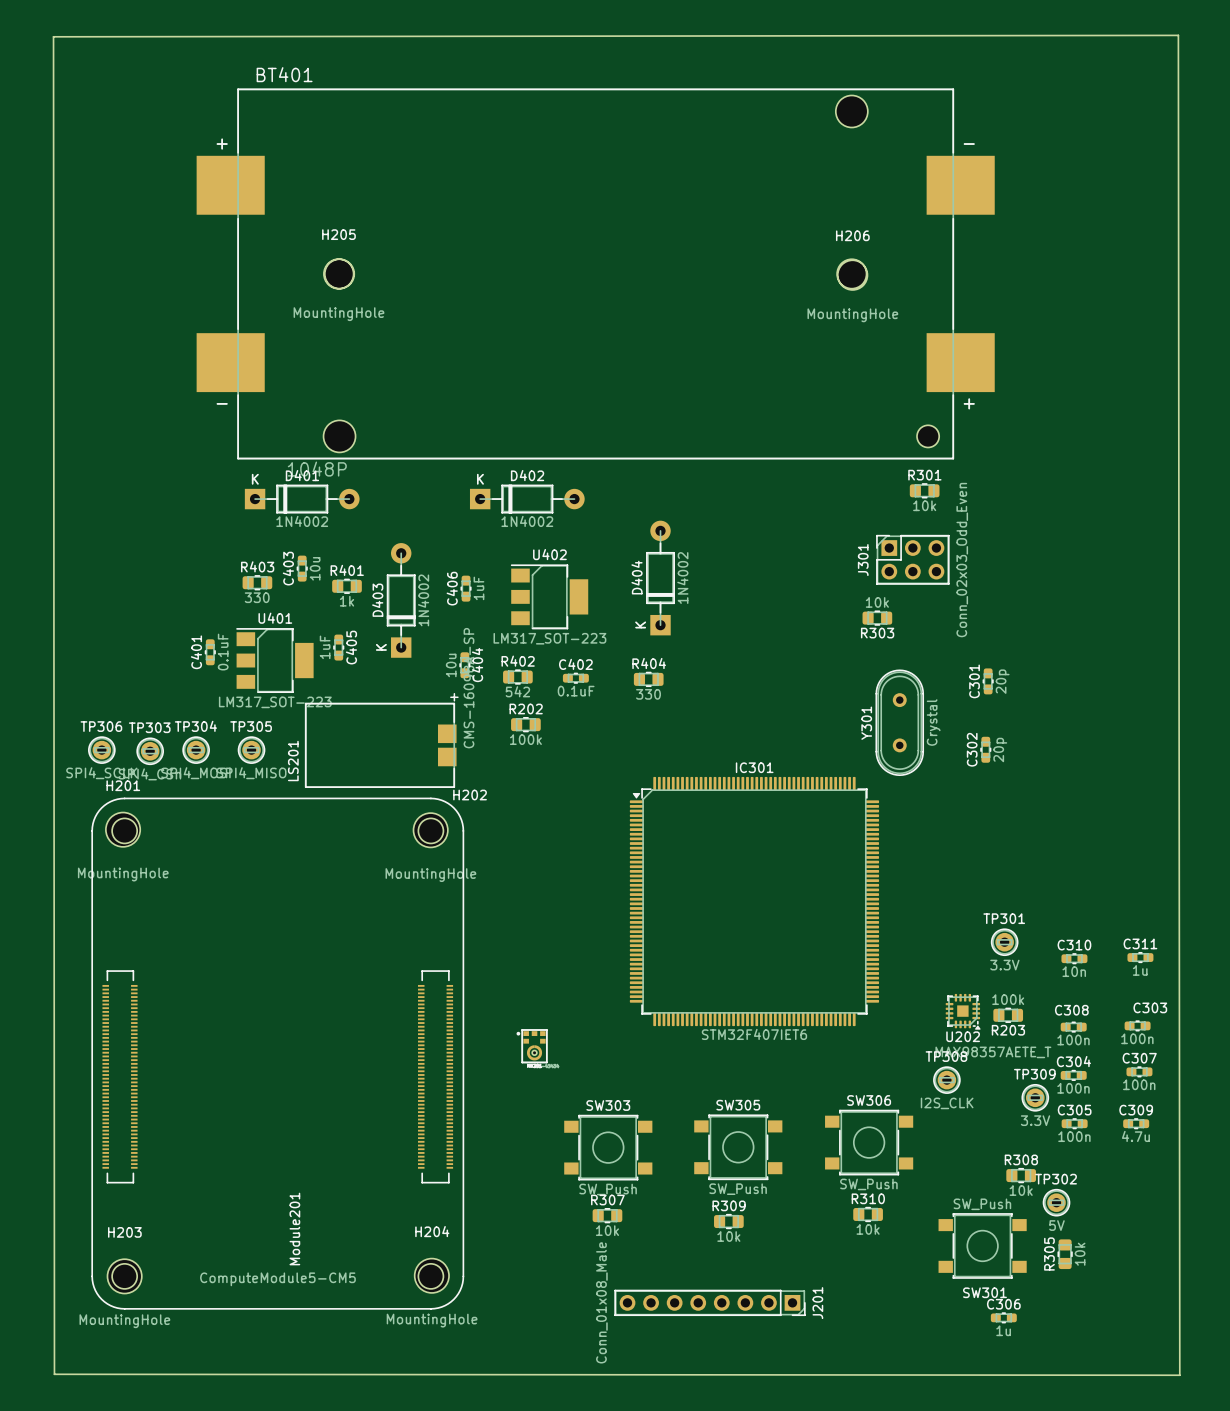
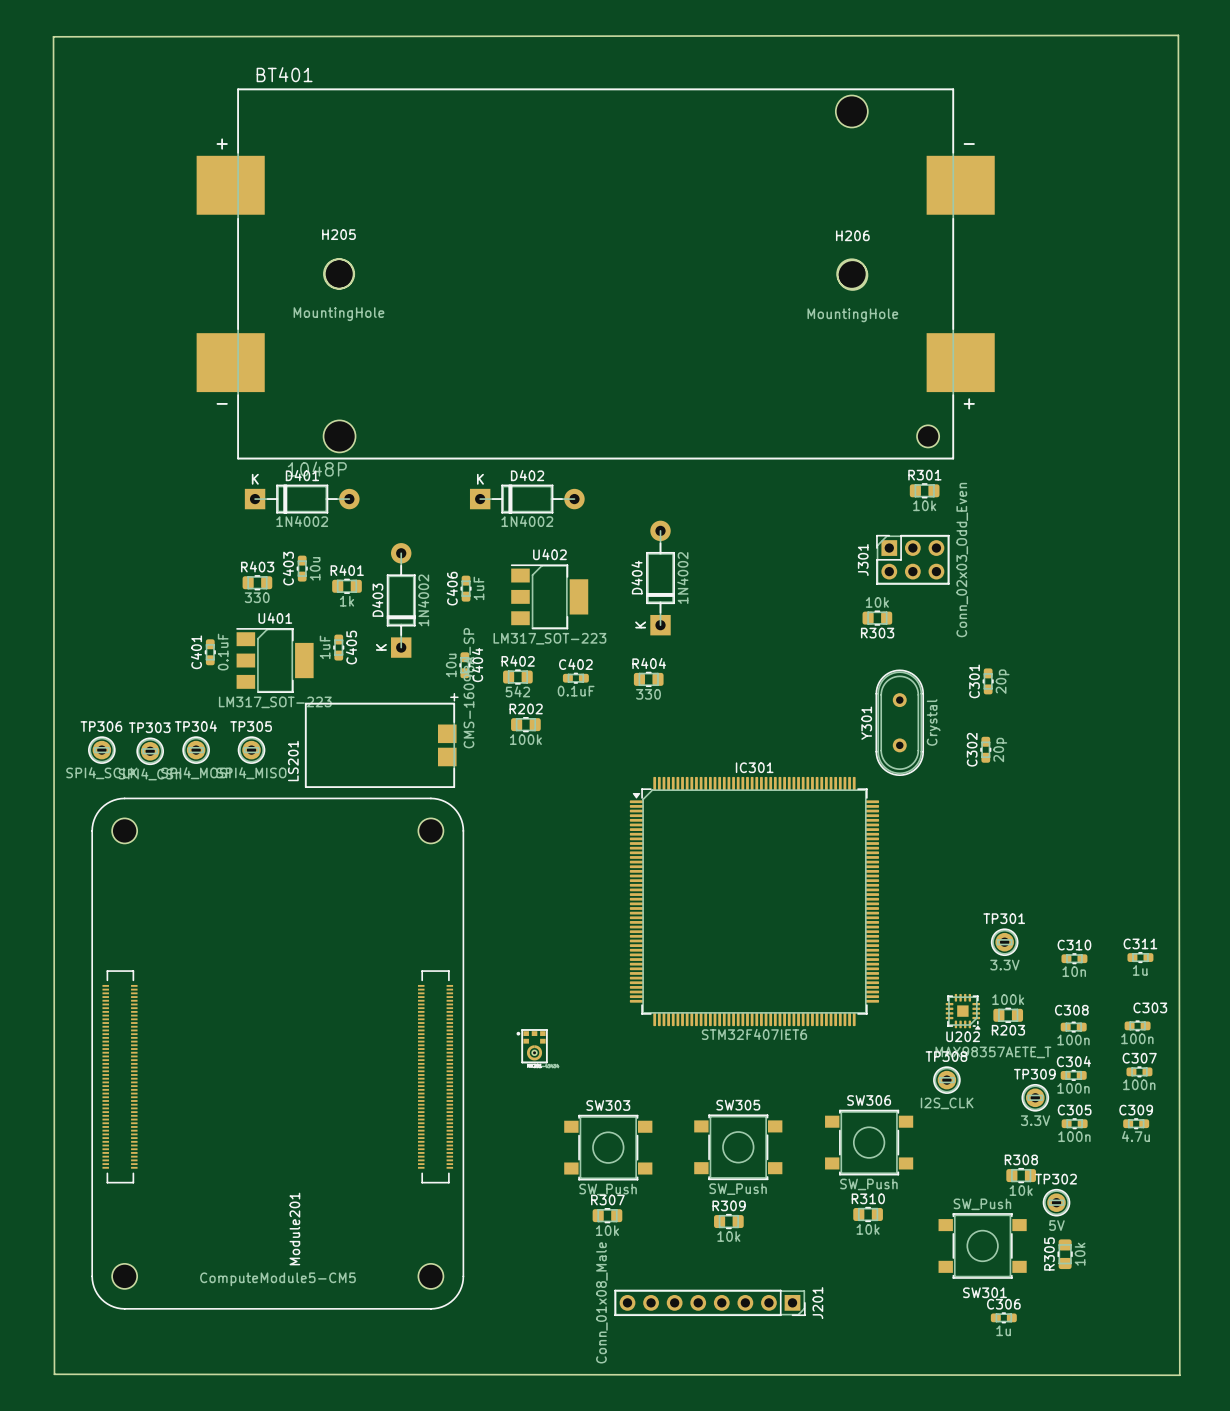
H201: MountingHole (123, 829) -> none
H202: MountingHole (430, 830) -> none
H204: MountingHole (431, 1275) -> none
H203: MountingHole (124, 1276) -> none

